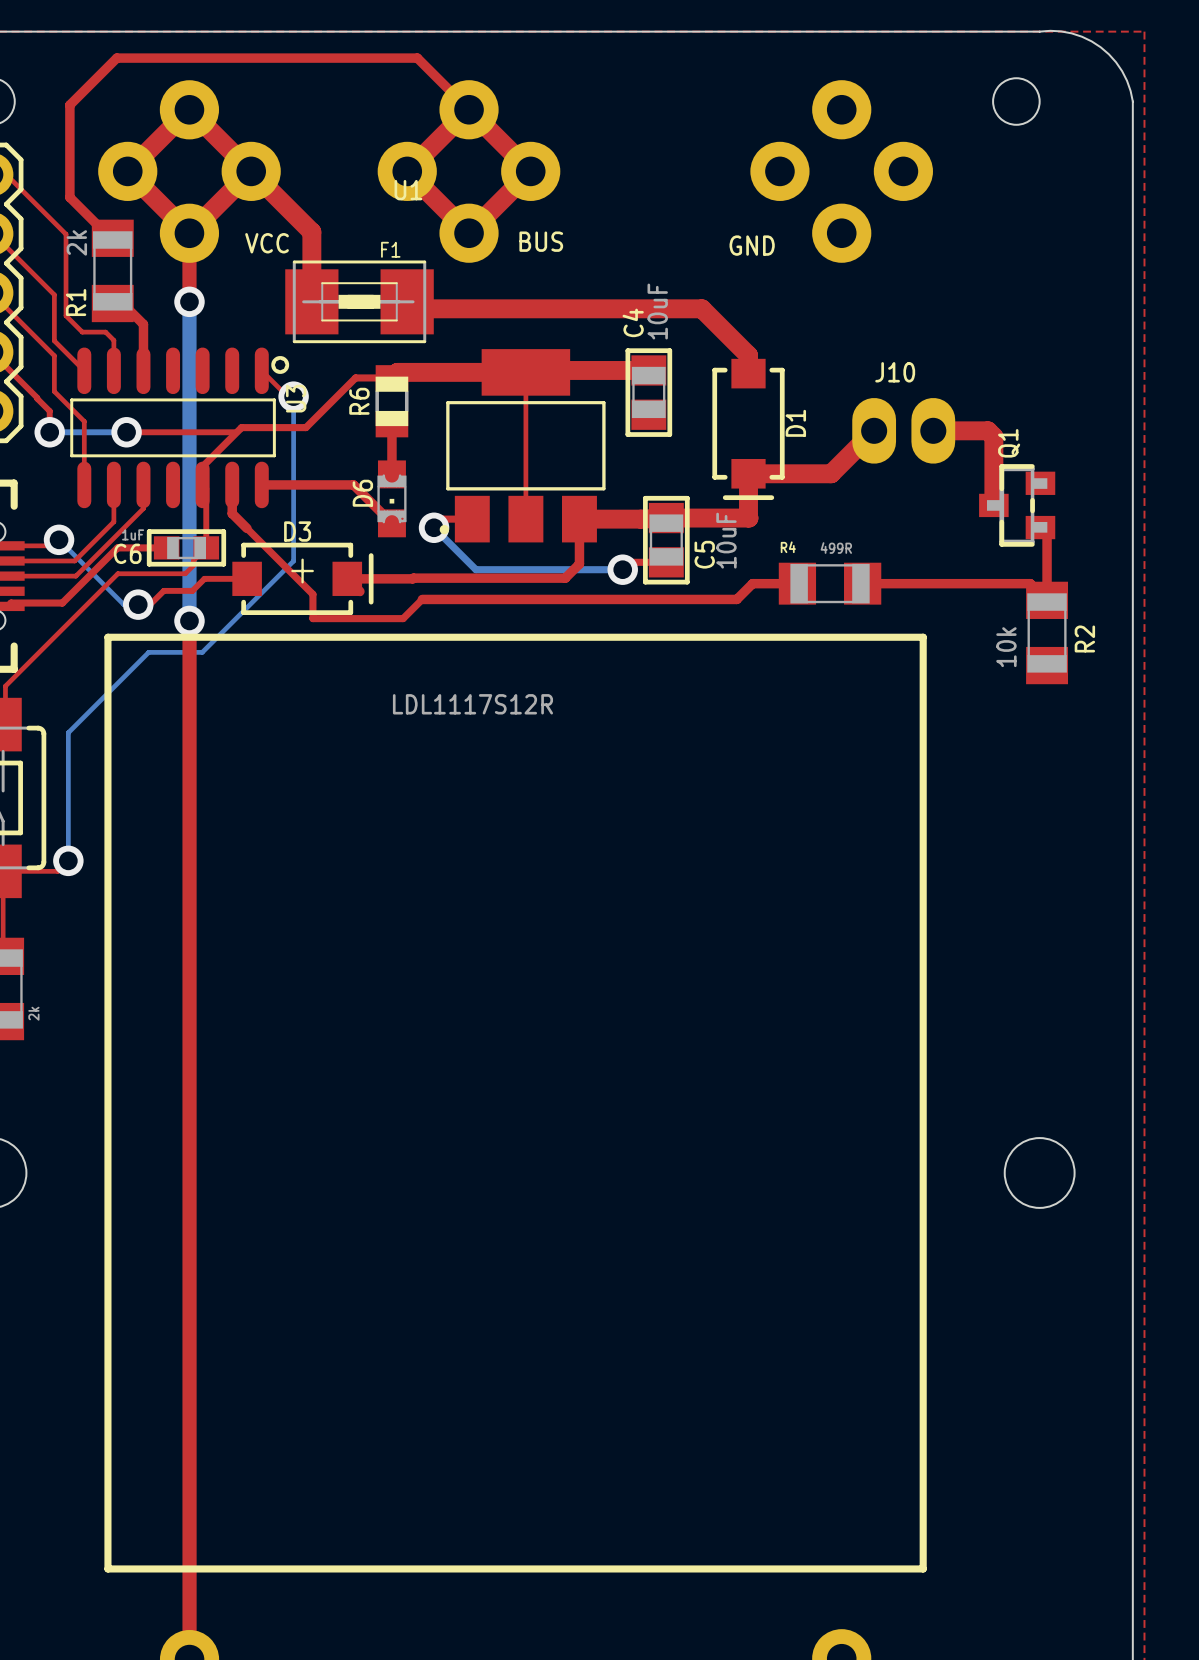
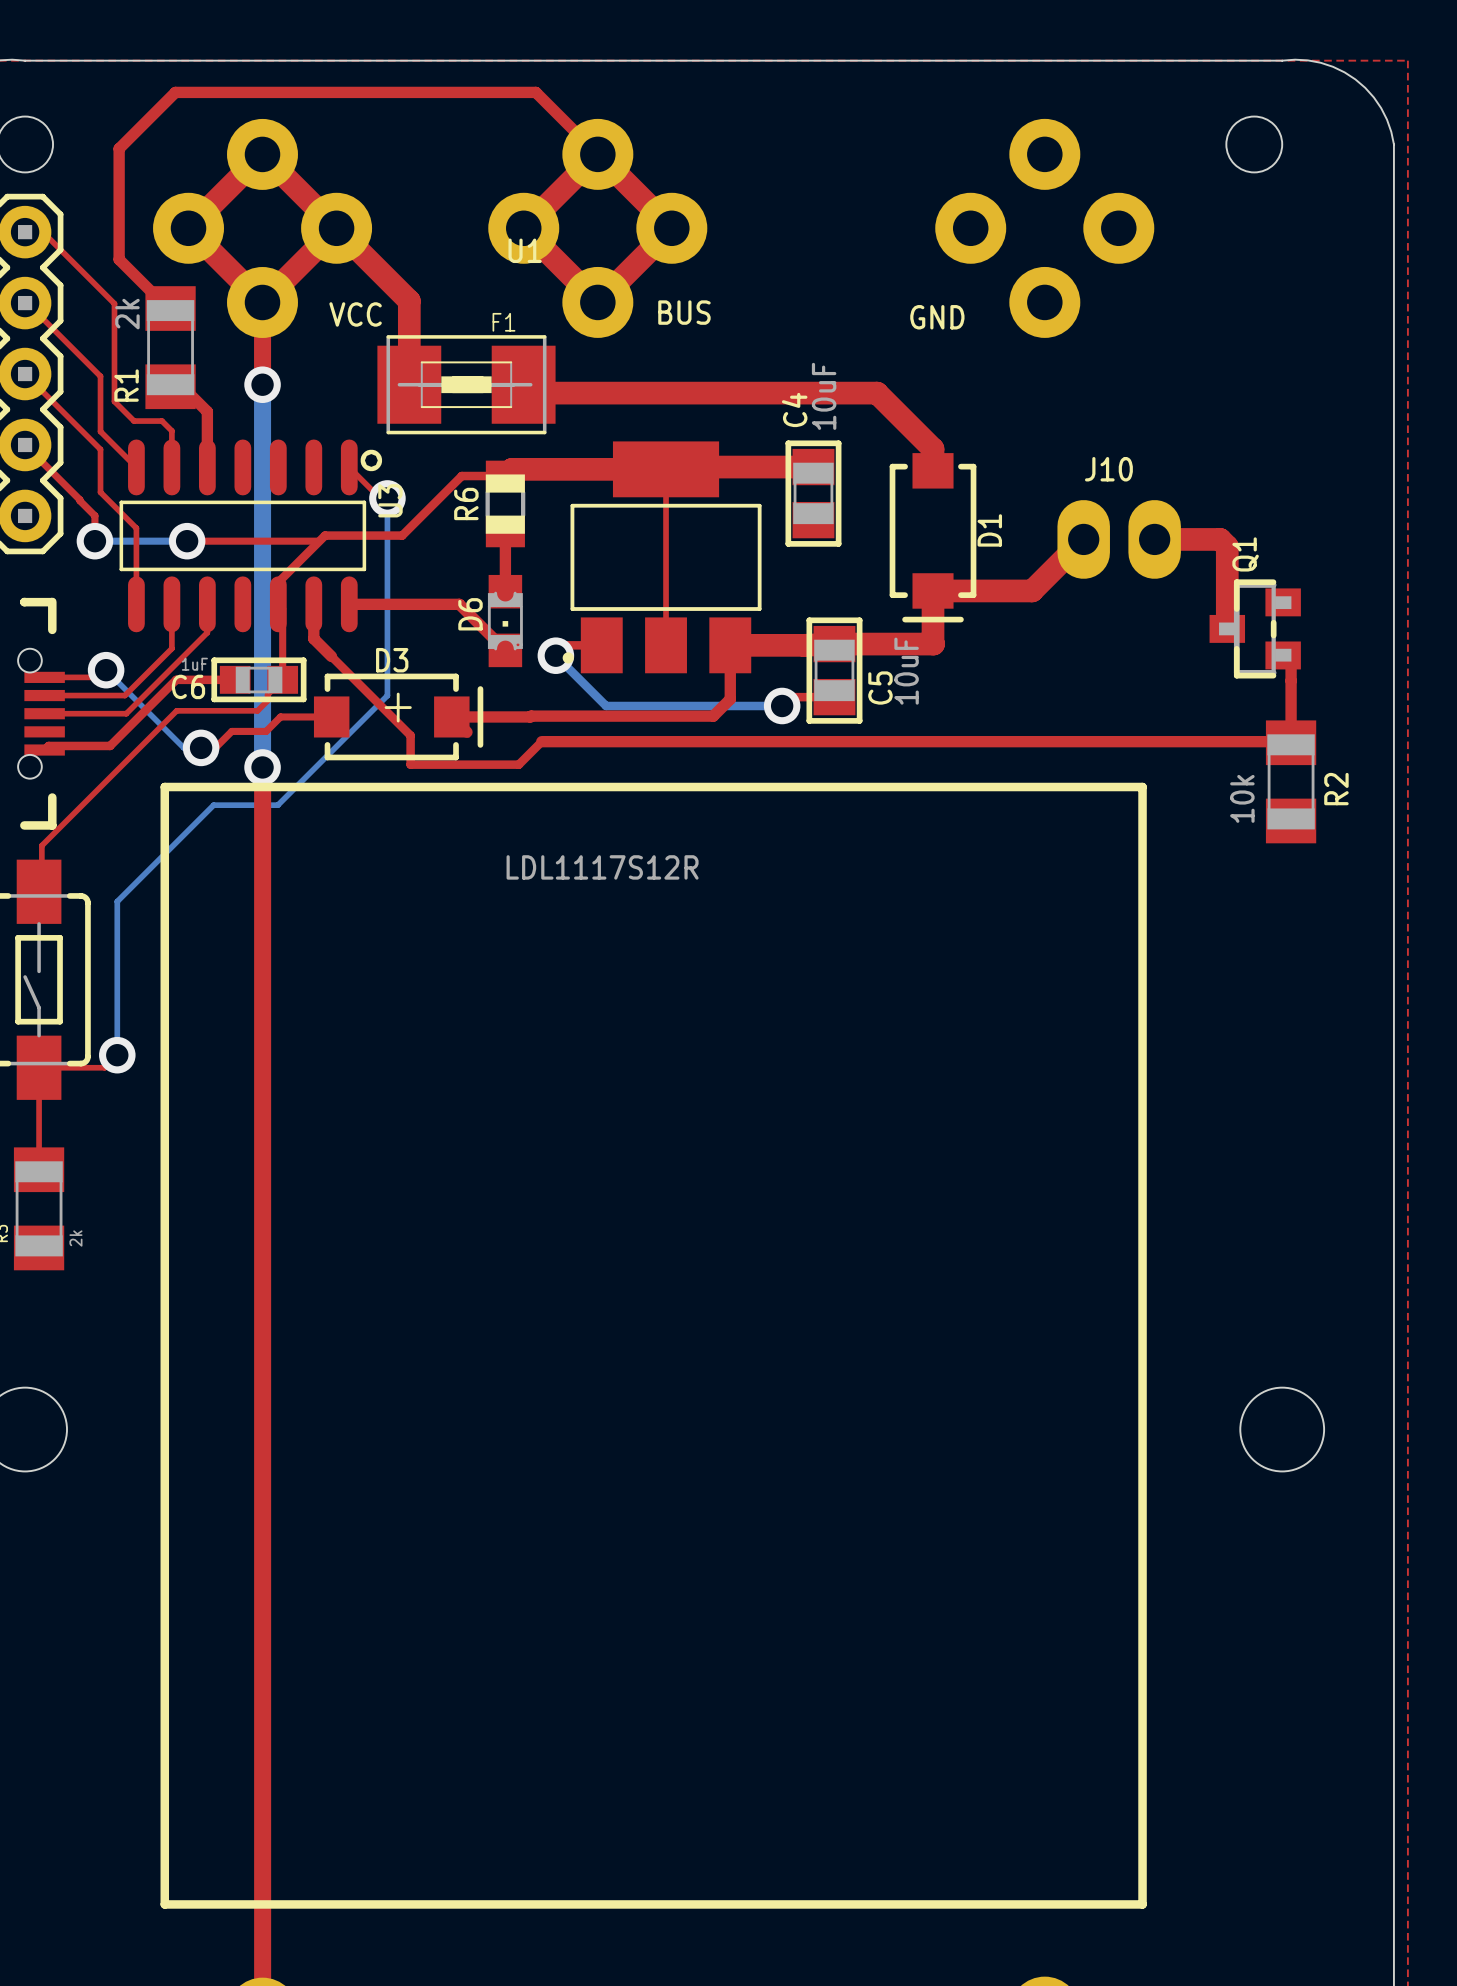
top track: (797, 583) (752, 583) (736, 599) -> none
R4: 499R (830, 583) -> none
top track: (862, 583) (1030, 583) (1047, 600) -> (919, 741) (1291, 741)

